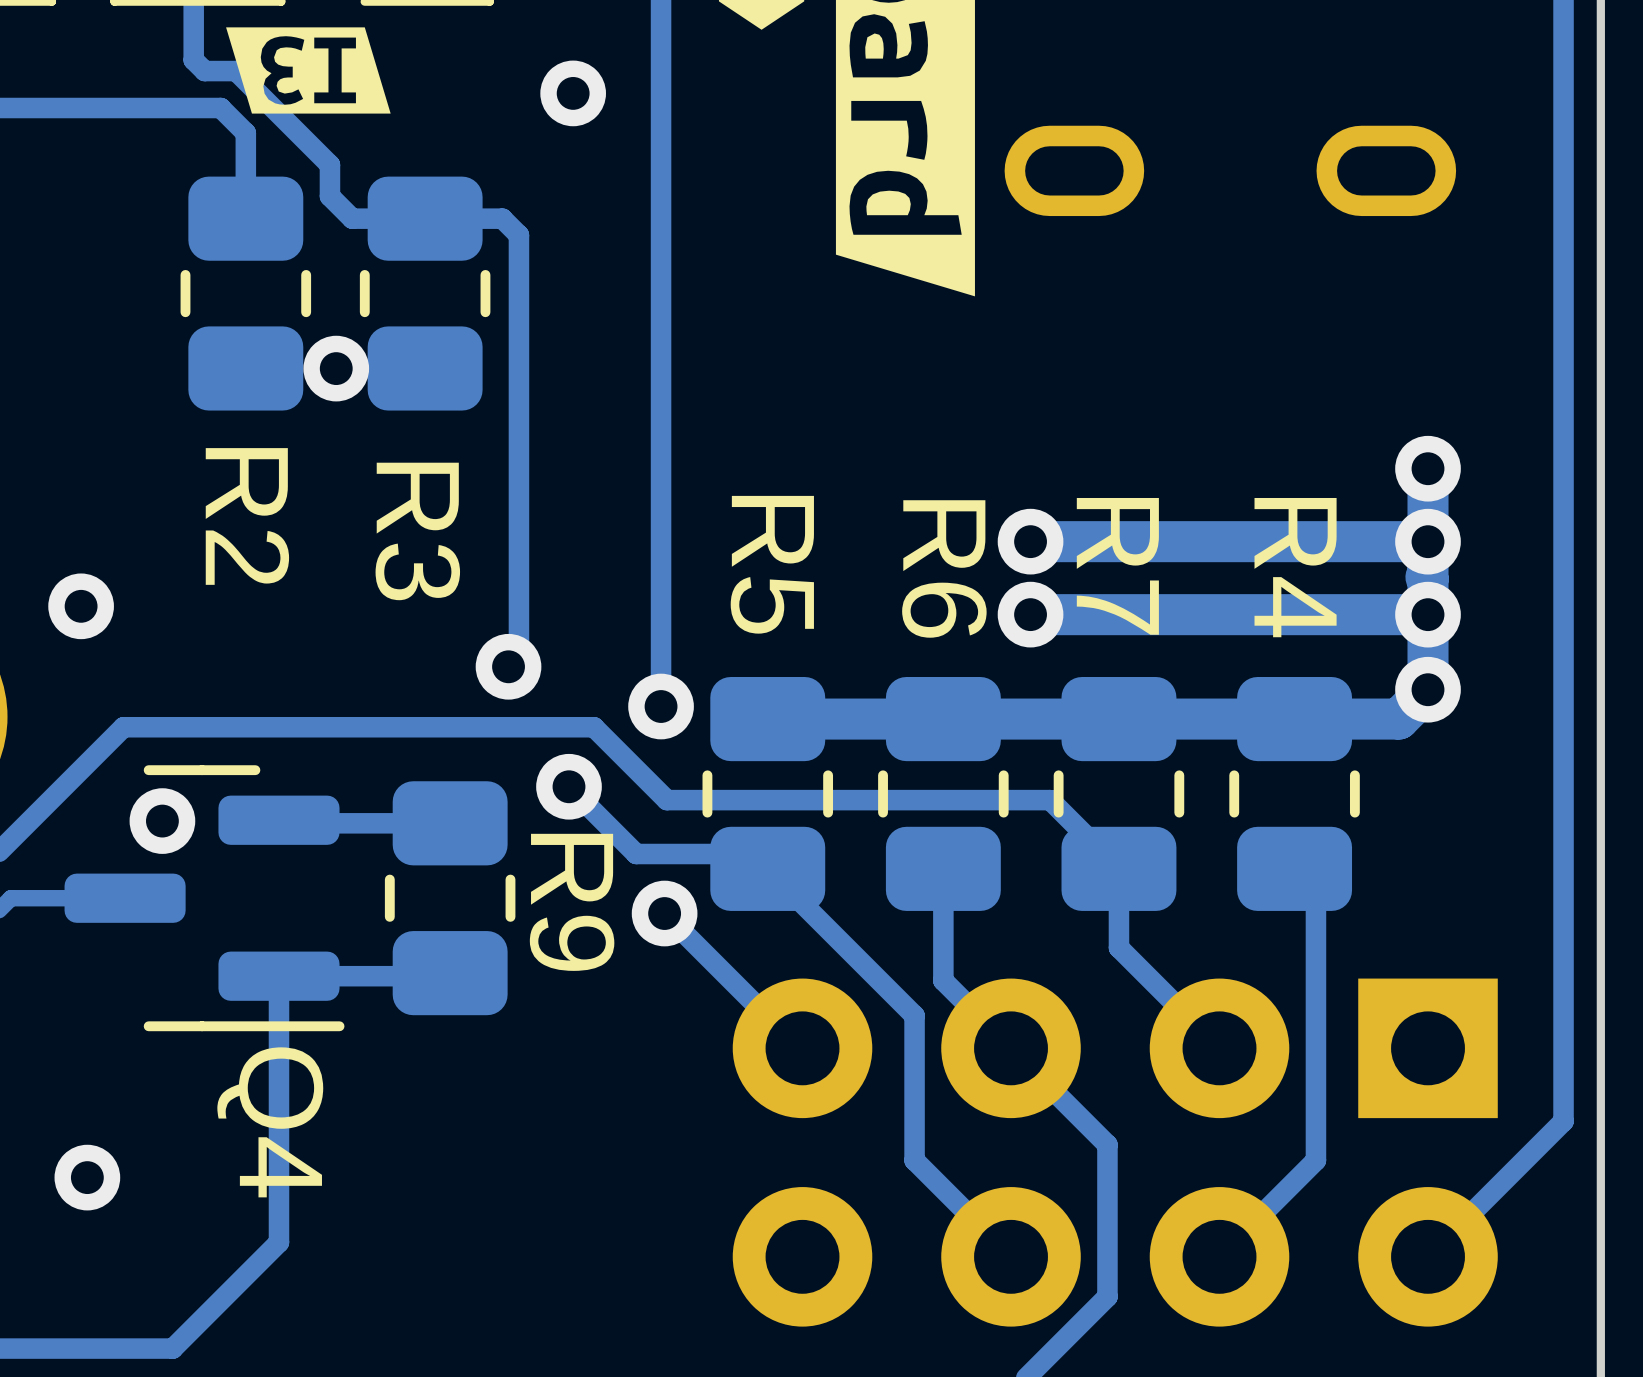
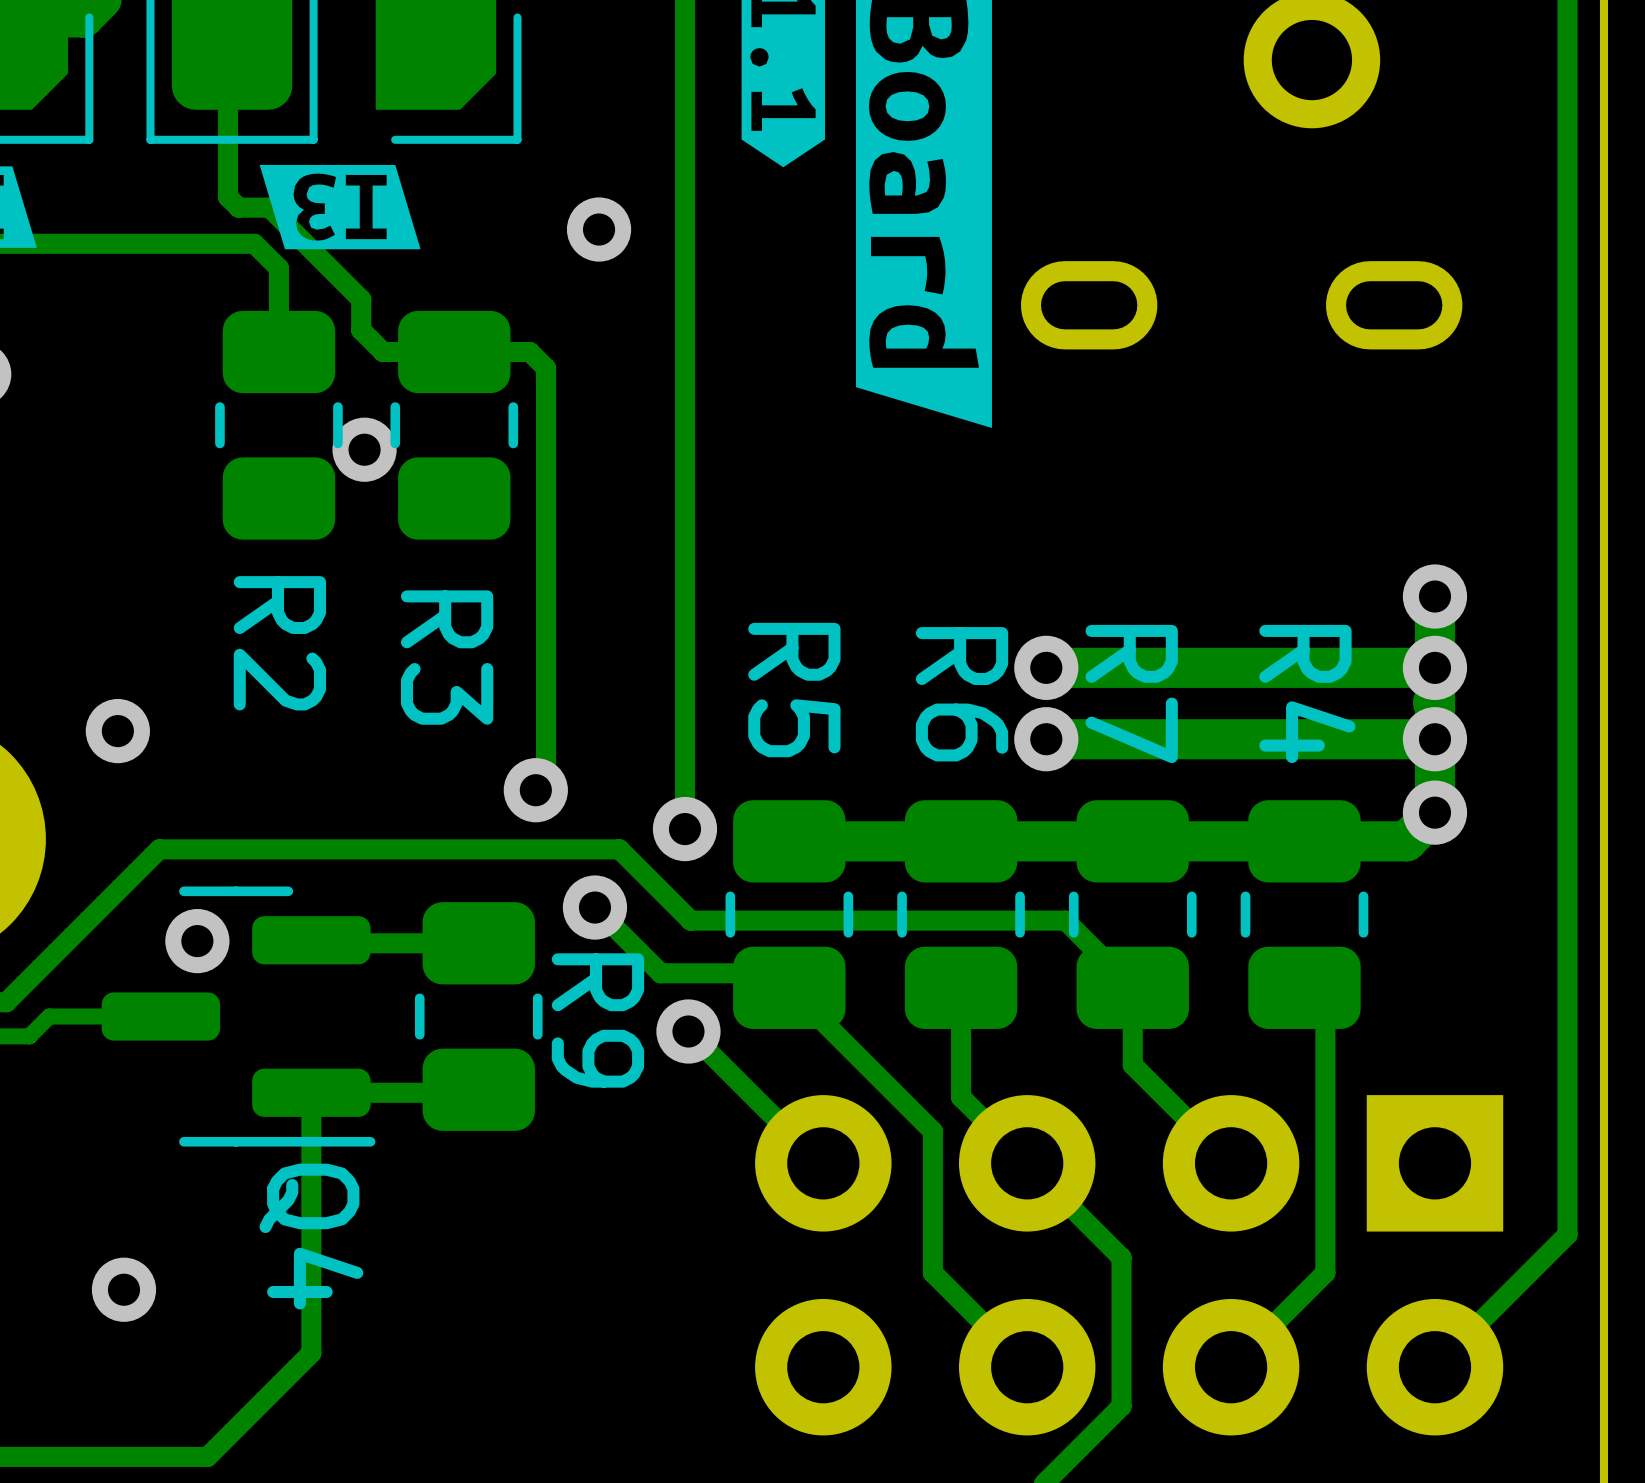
via position: (336, 368) -> (364, 449)

